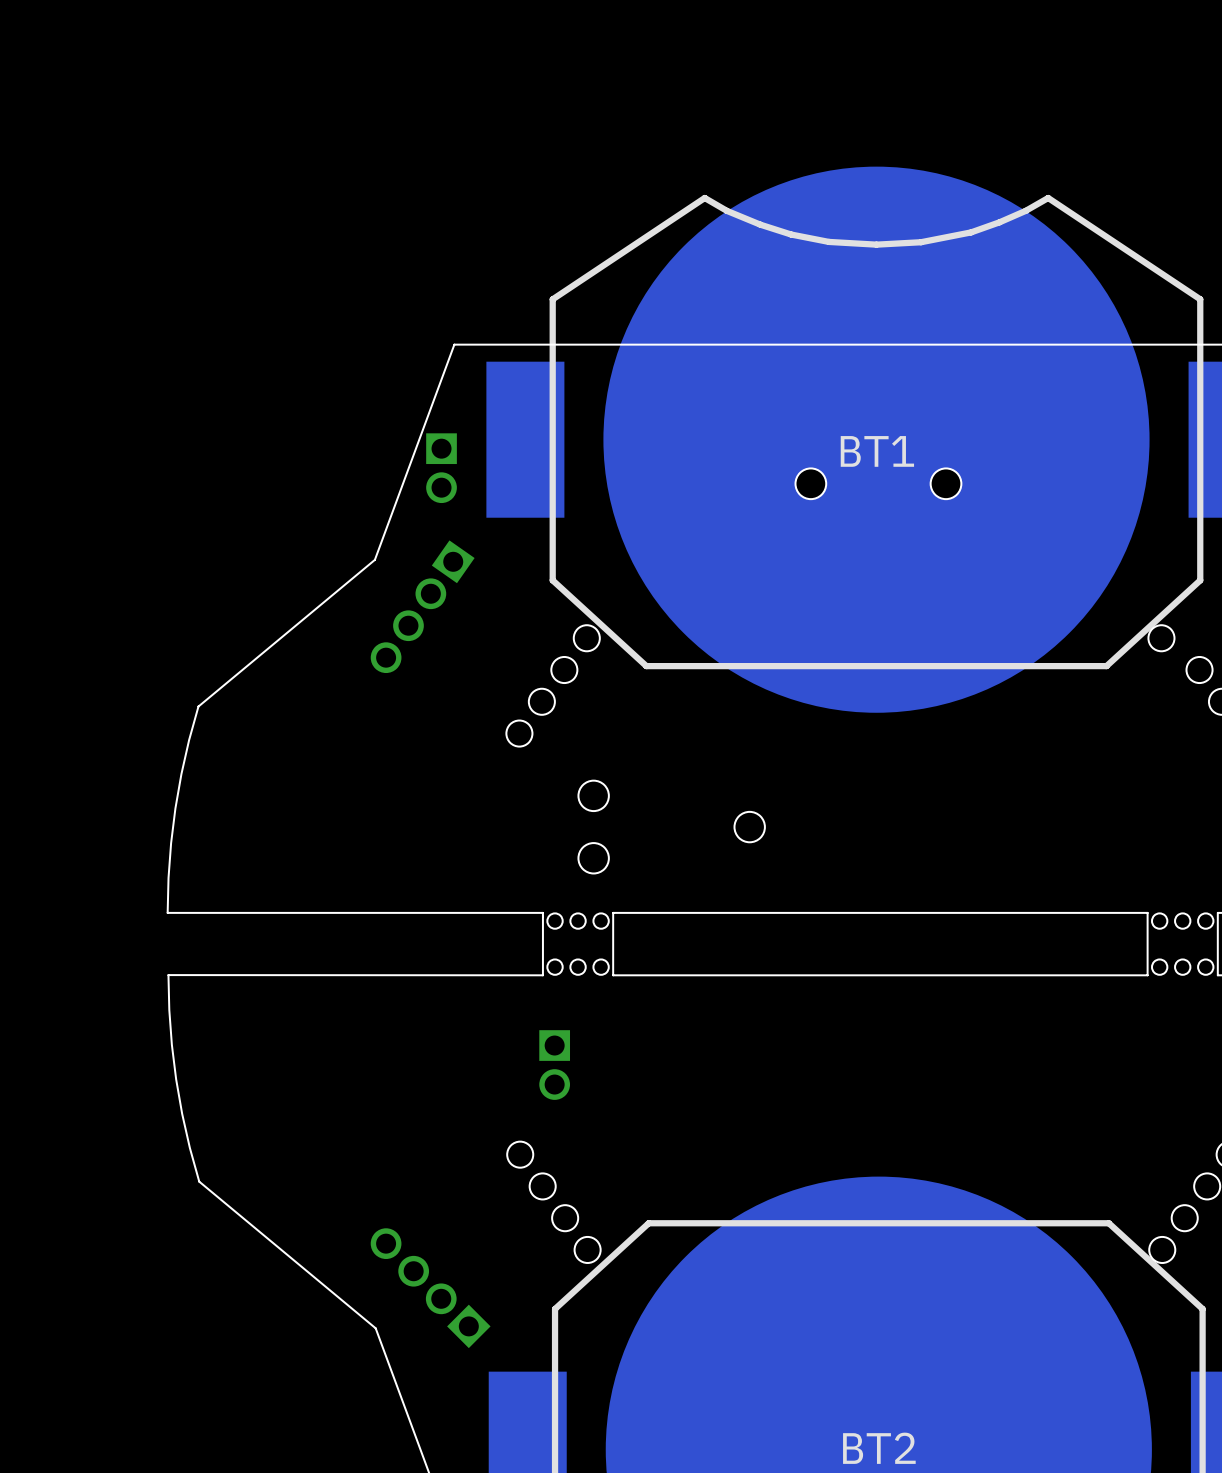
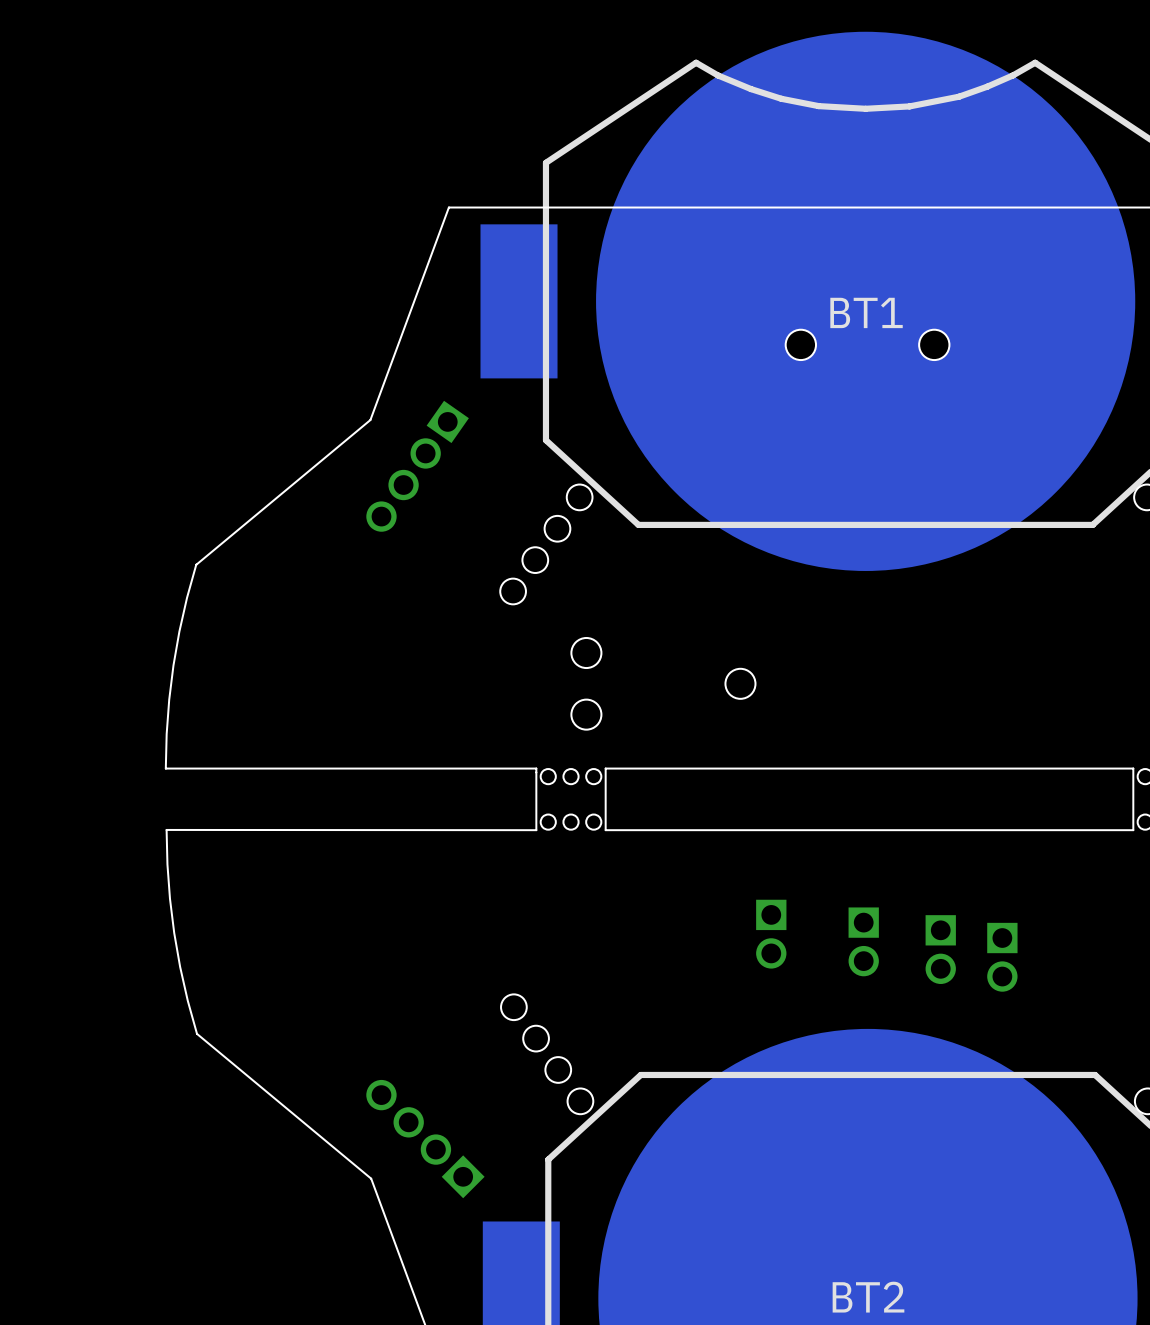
part: (441, 468) -> none
part: (554, 1065) -> none
part: none -> (771, 934)
part: none -> (863, 941)
part: none -> (940, 949)
part: none -> (1002, 957)

